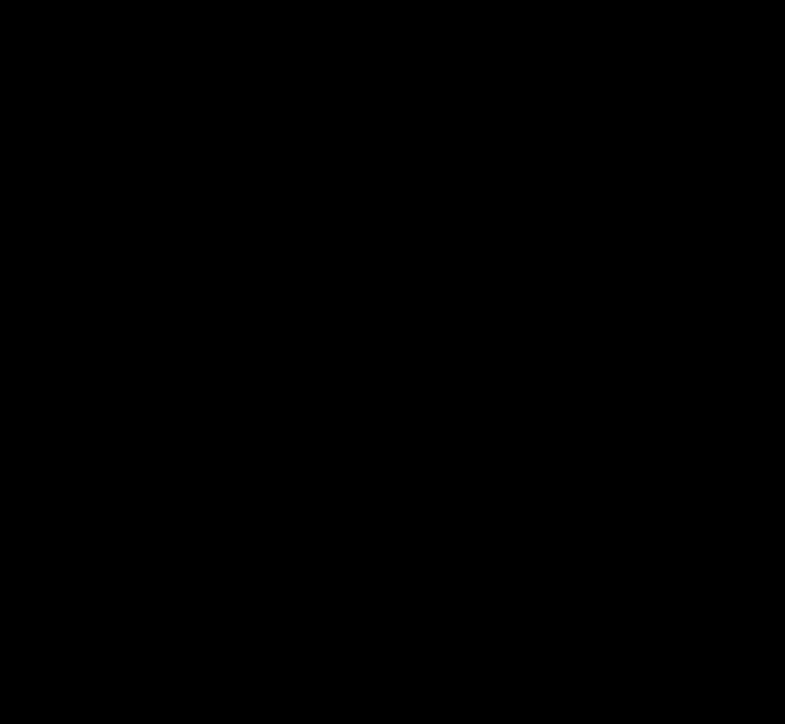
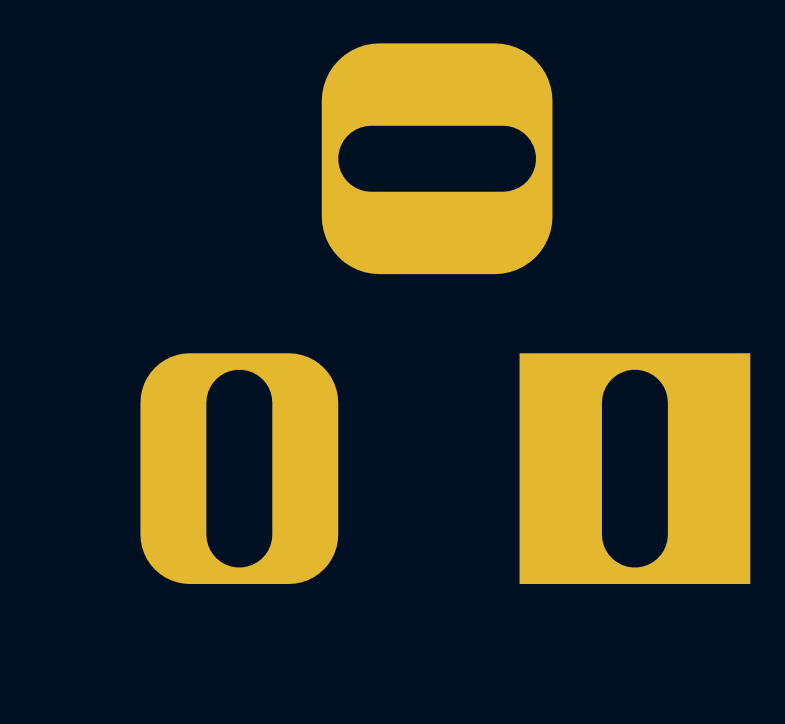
part: none -> (445, 313)

